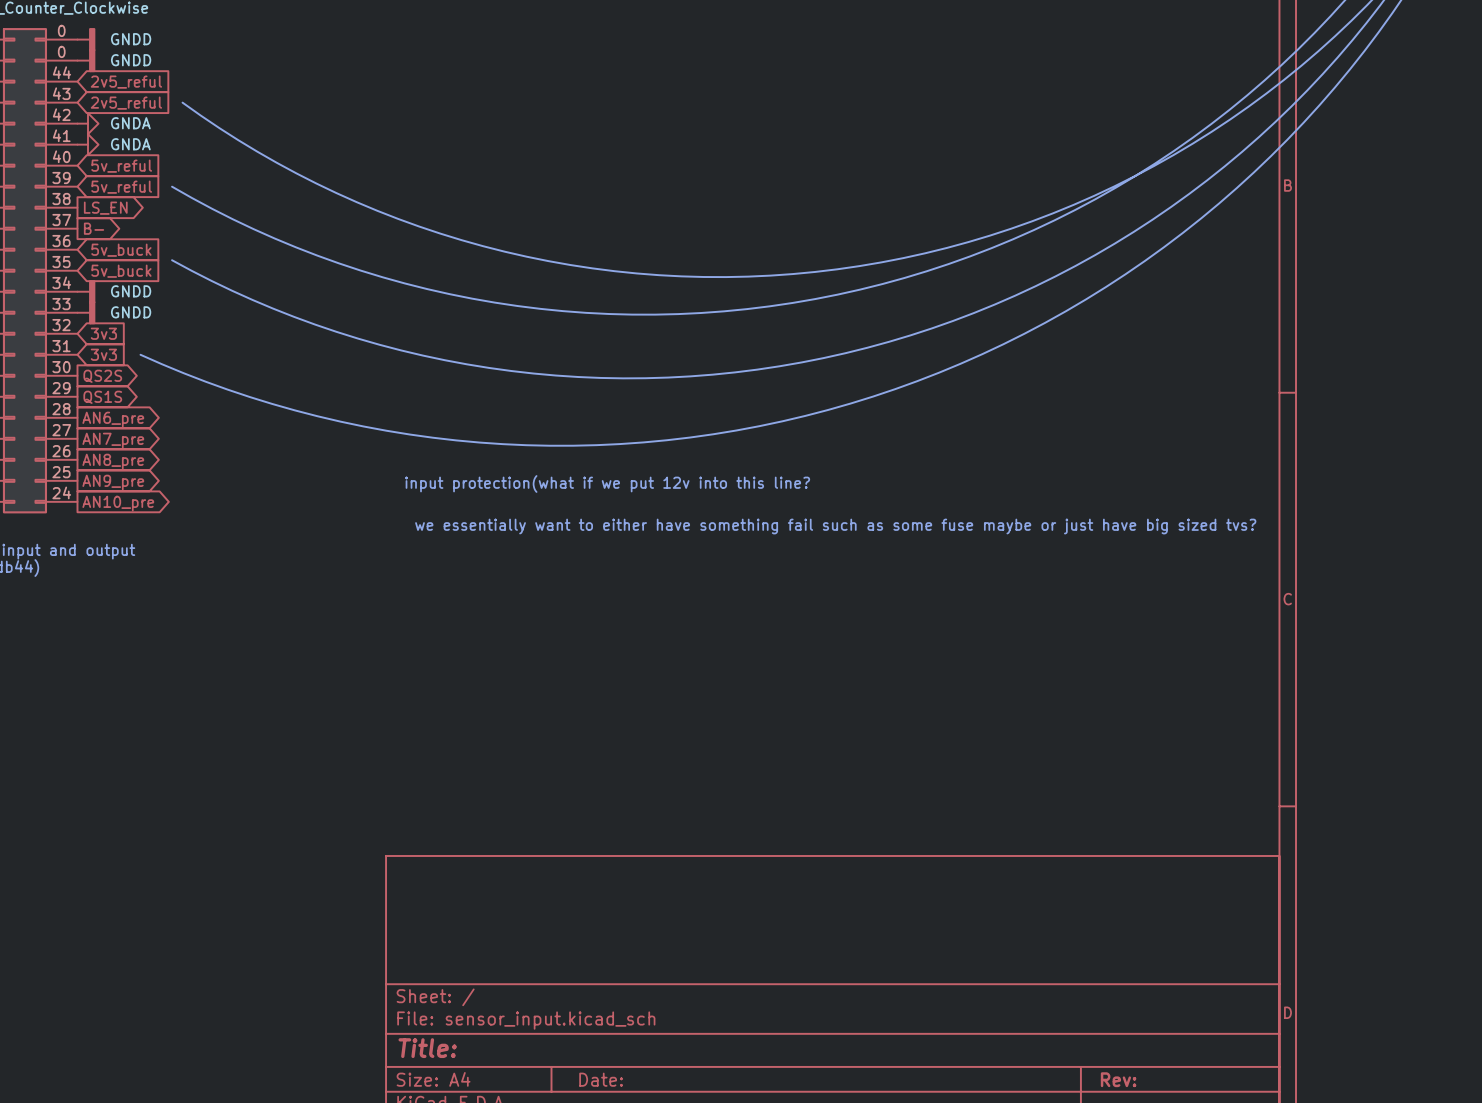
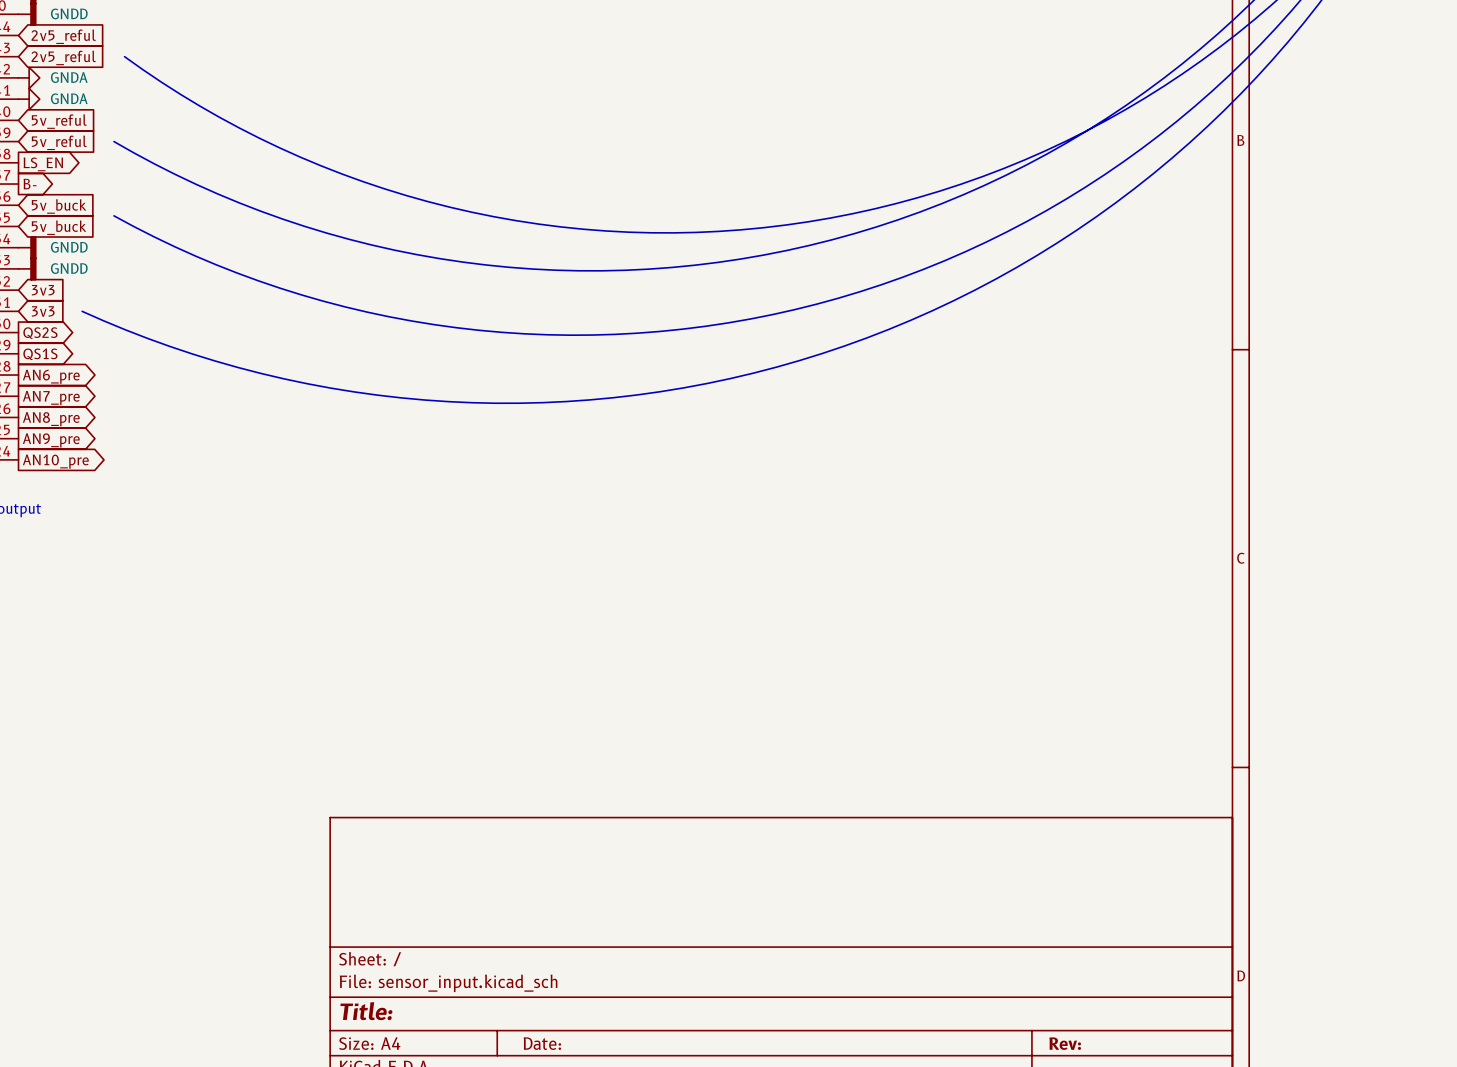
text: input protection(what if we put 12v into this line? (607, 483) -> none
text: we essentially want to either have something fail such as some fuse maybe or just have big sized tvs? (835, 526) -> none

